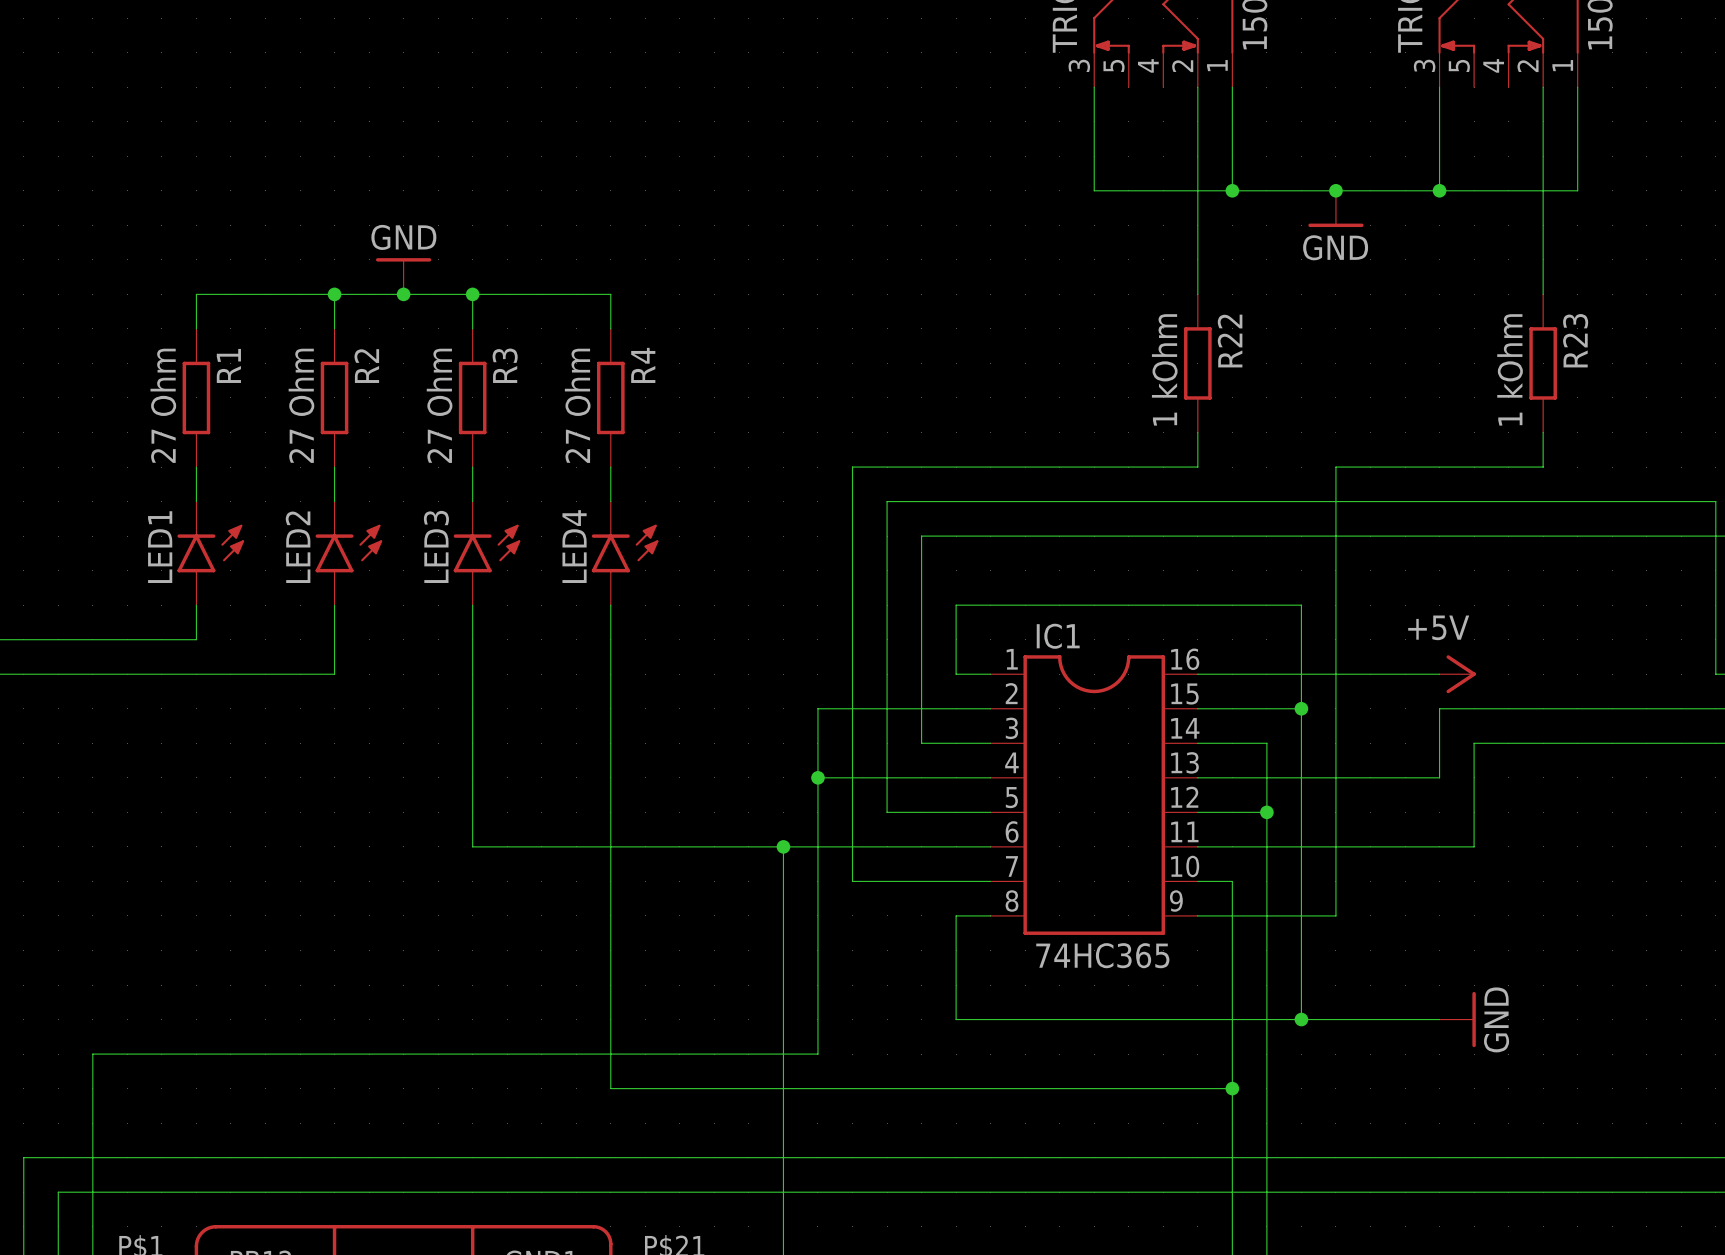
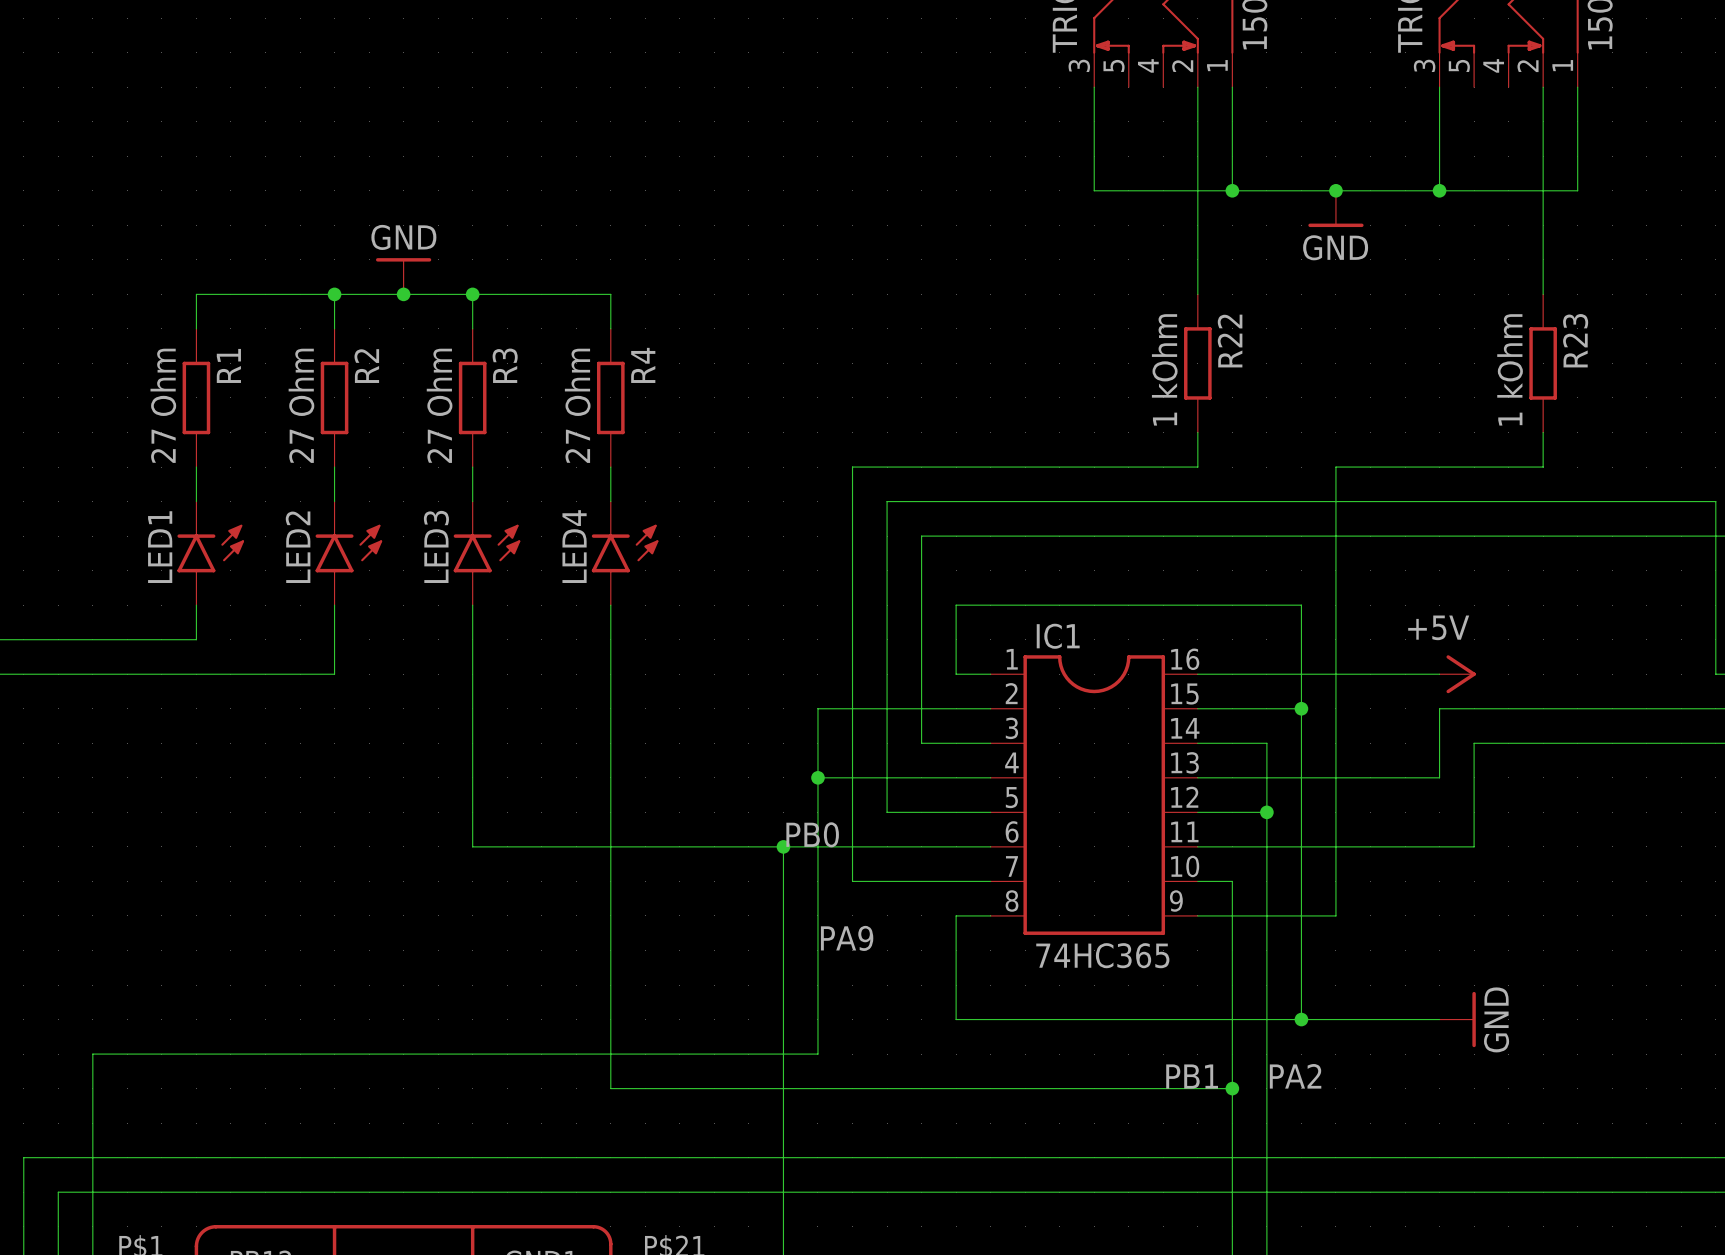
label: none -> PB0 (812, 834)
label: none -> PA9 (847, 938)
label: none -> PB1 (1192, 1076)
label: none -> PA2 (1295, 1076)

